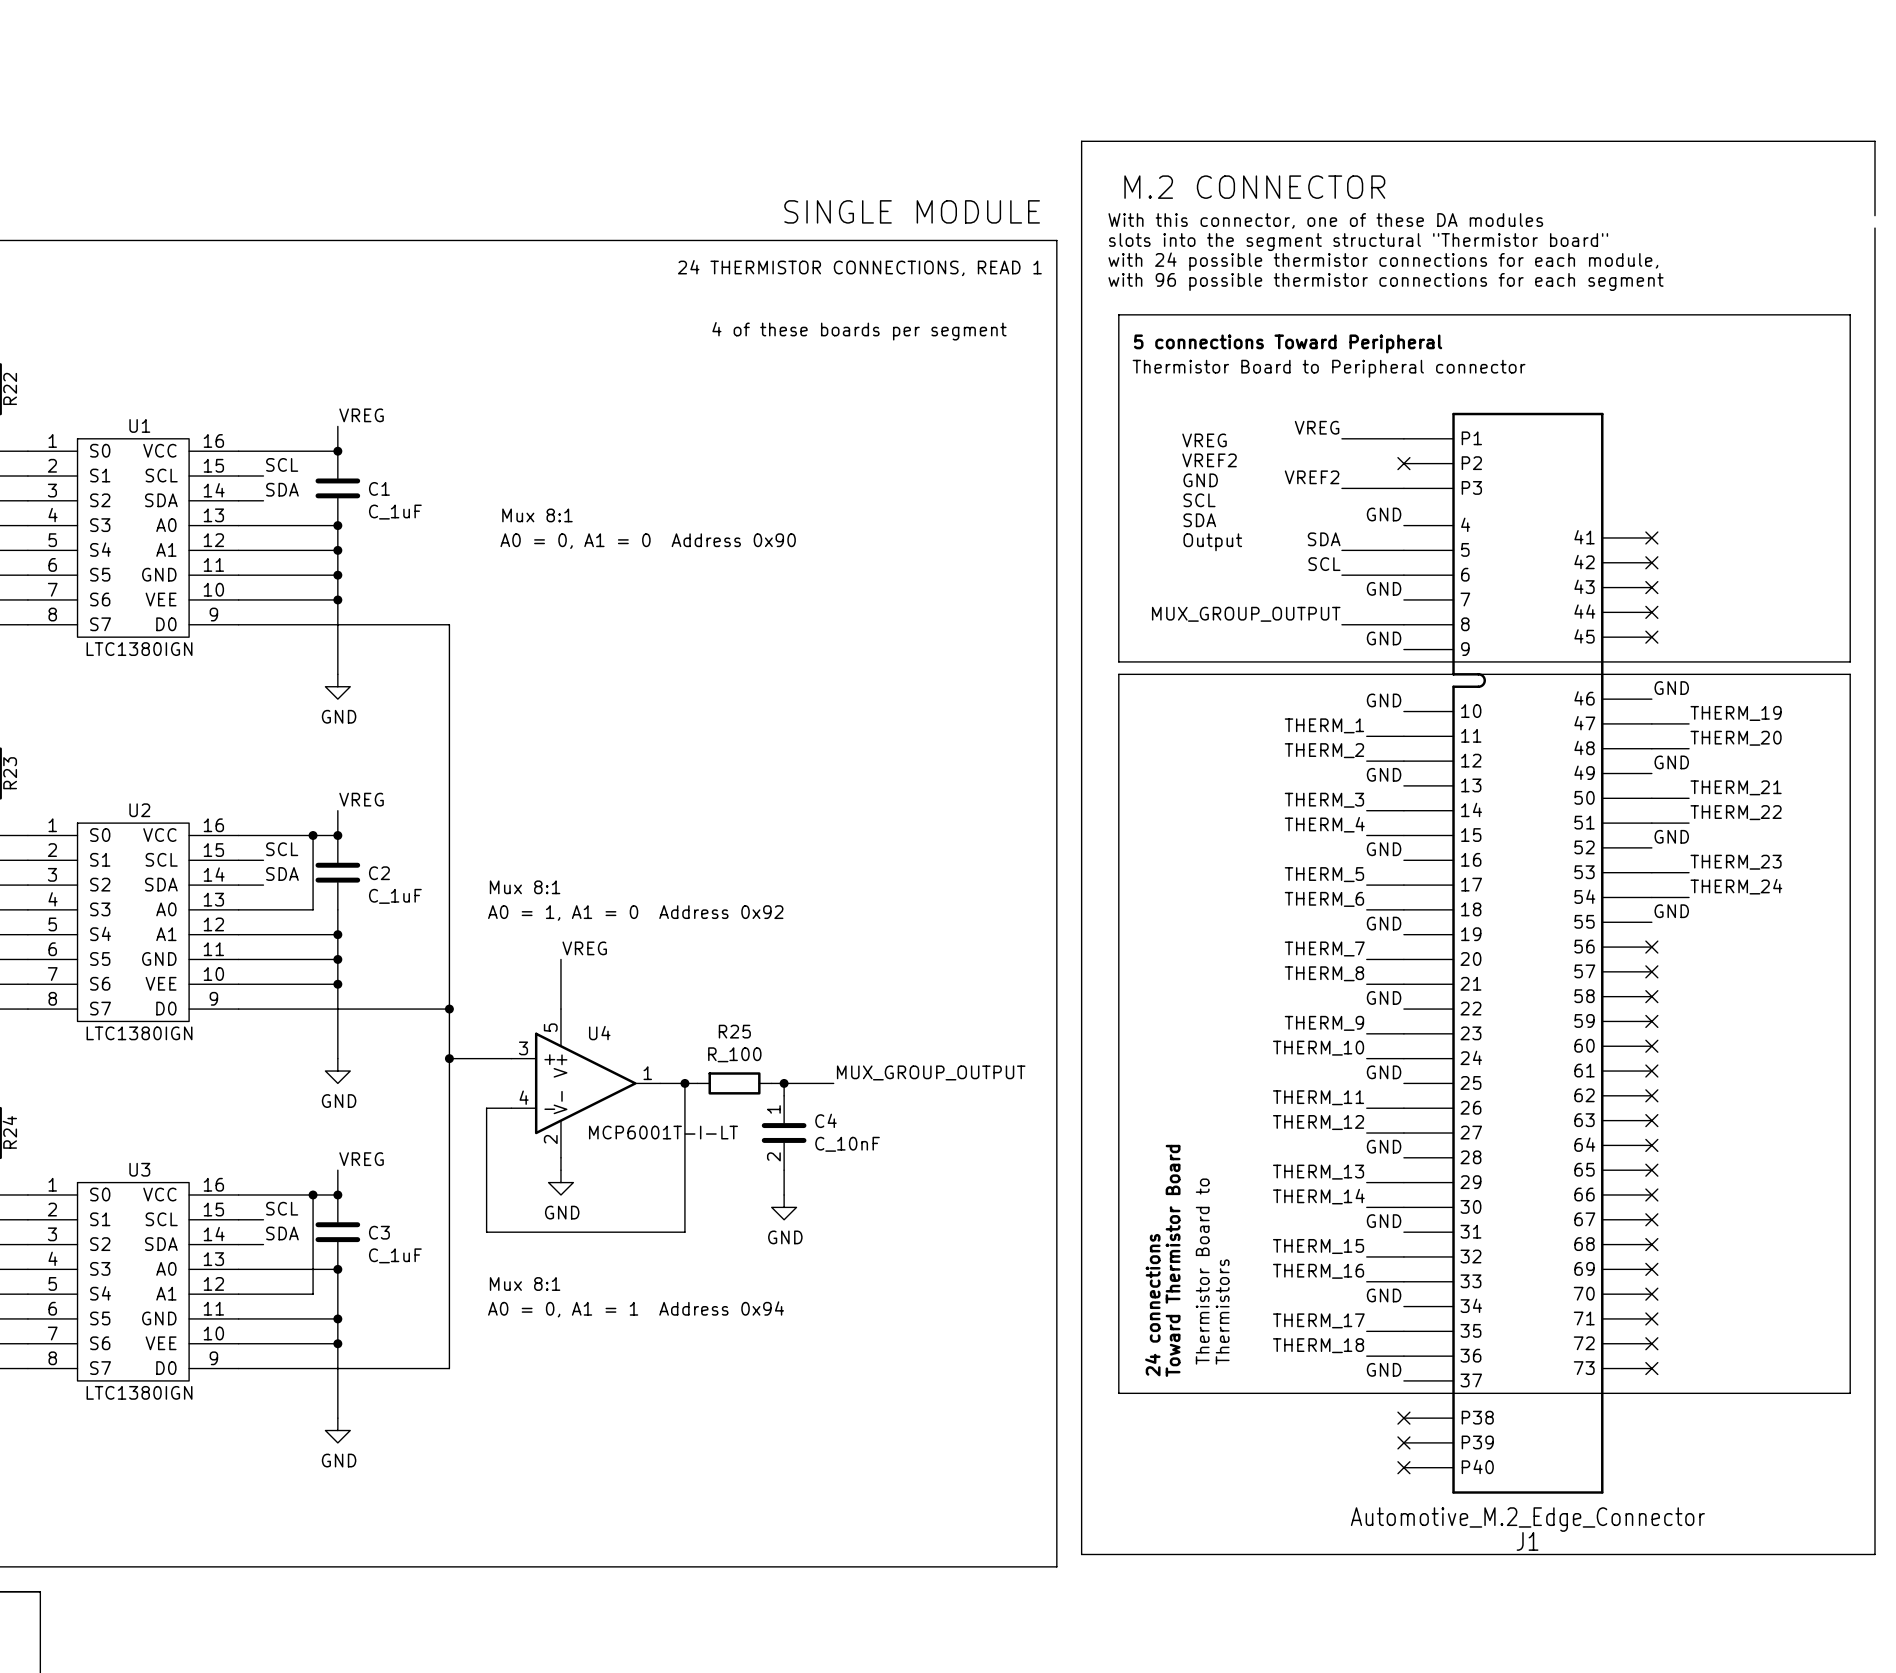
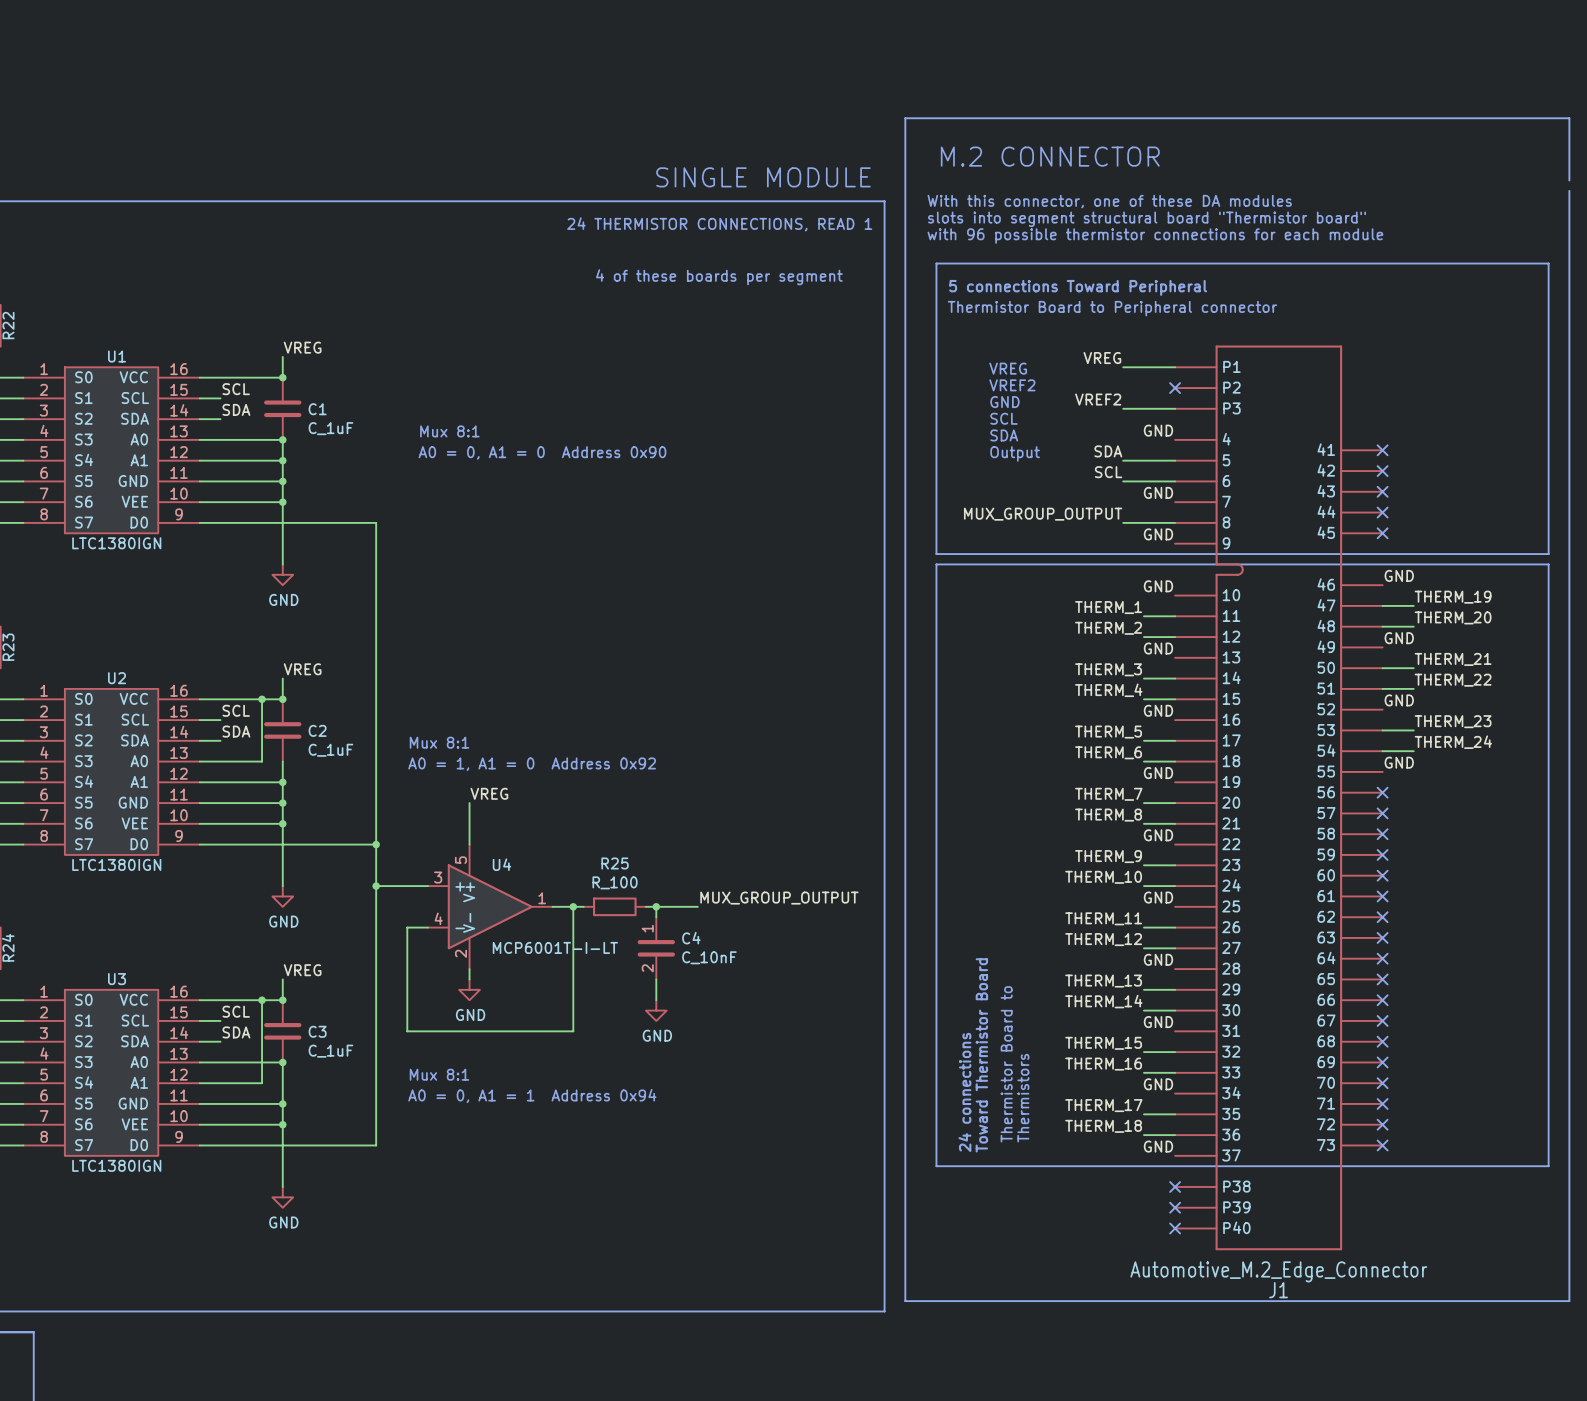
text: With this connector, one of these DA modules (1325, 220) -> none
text: slots into the segment structural "Thermistor board" (1358, 242) -> With this connector, one of these DA modules (1109, 201)
text: with 24 possible thermistor connections for each module, (1383, 261) -> slots into segment structural board "Thermistor board" (1147, 219)
text: with 96 possible thermistor connections for each segment (1386, 281) -> with 96 possible thermistor connections for each module (1155, 236)

